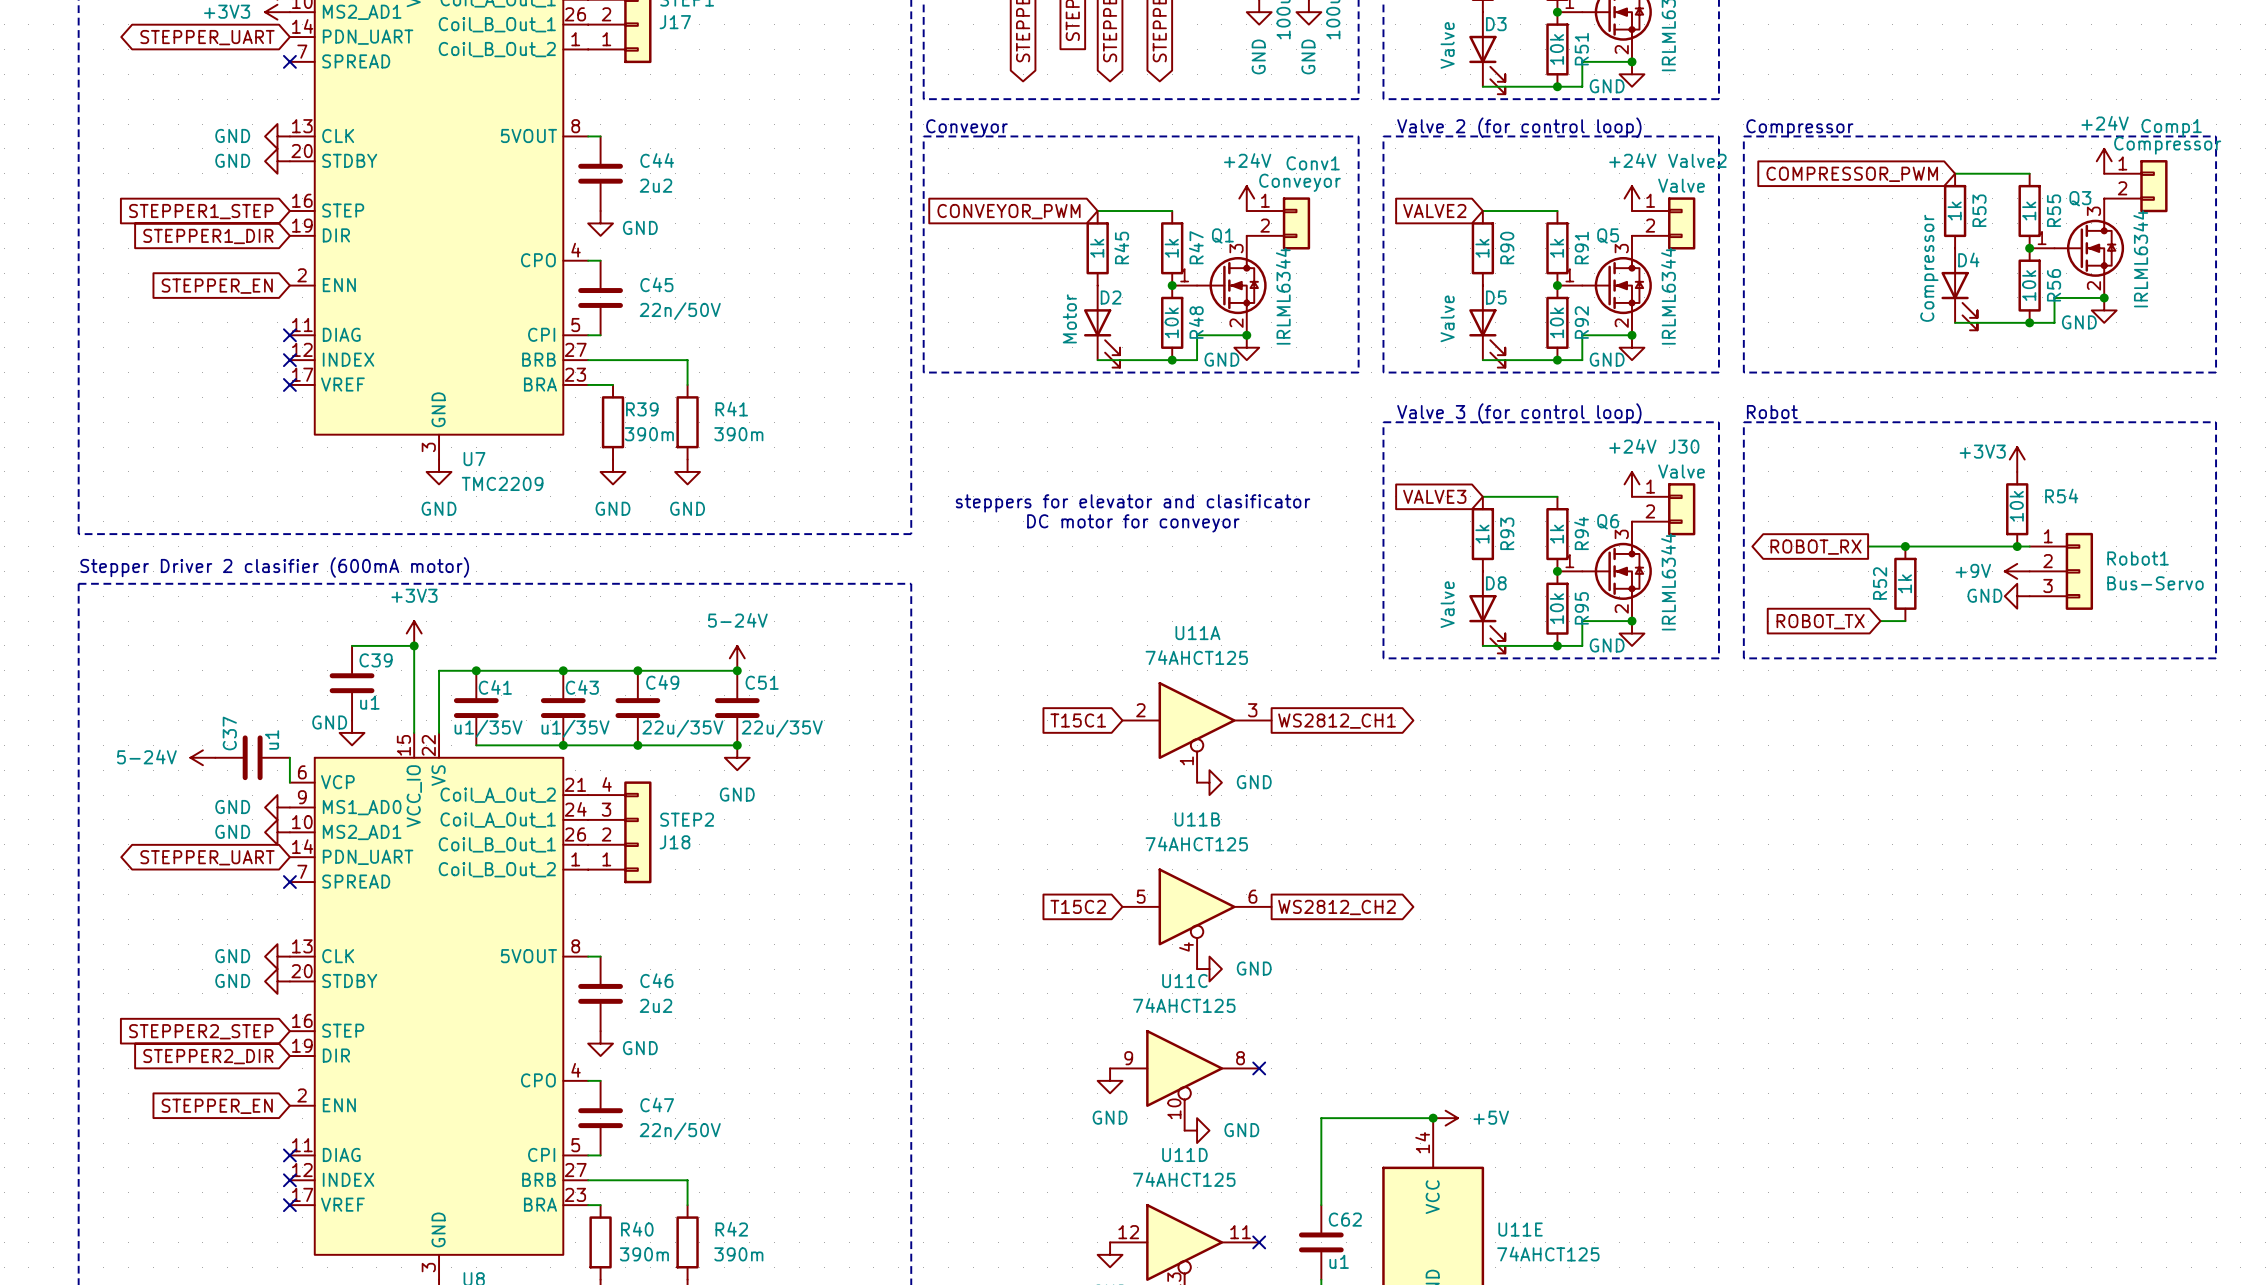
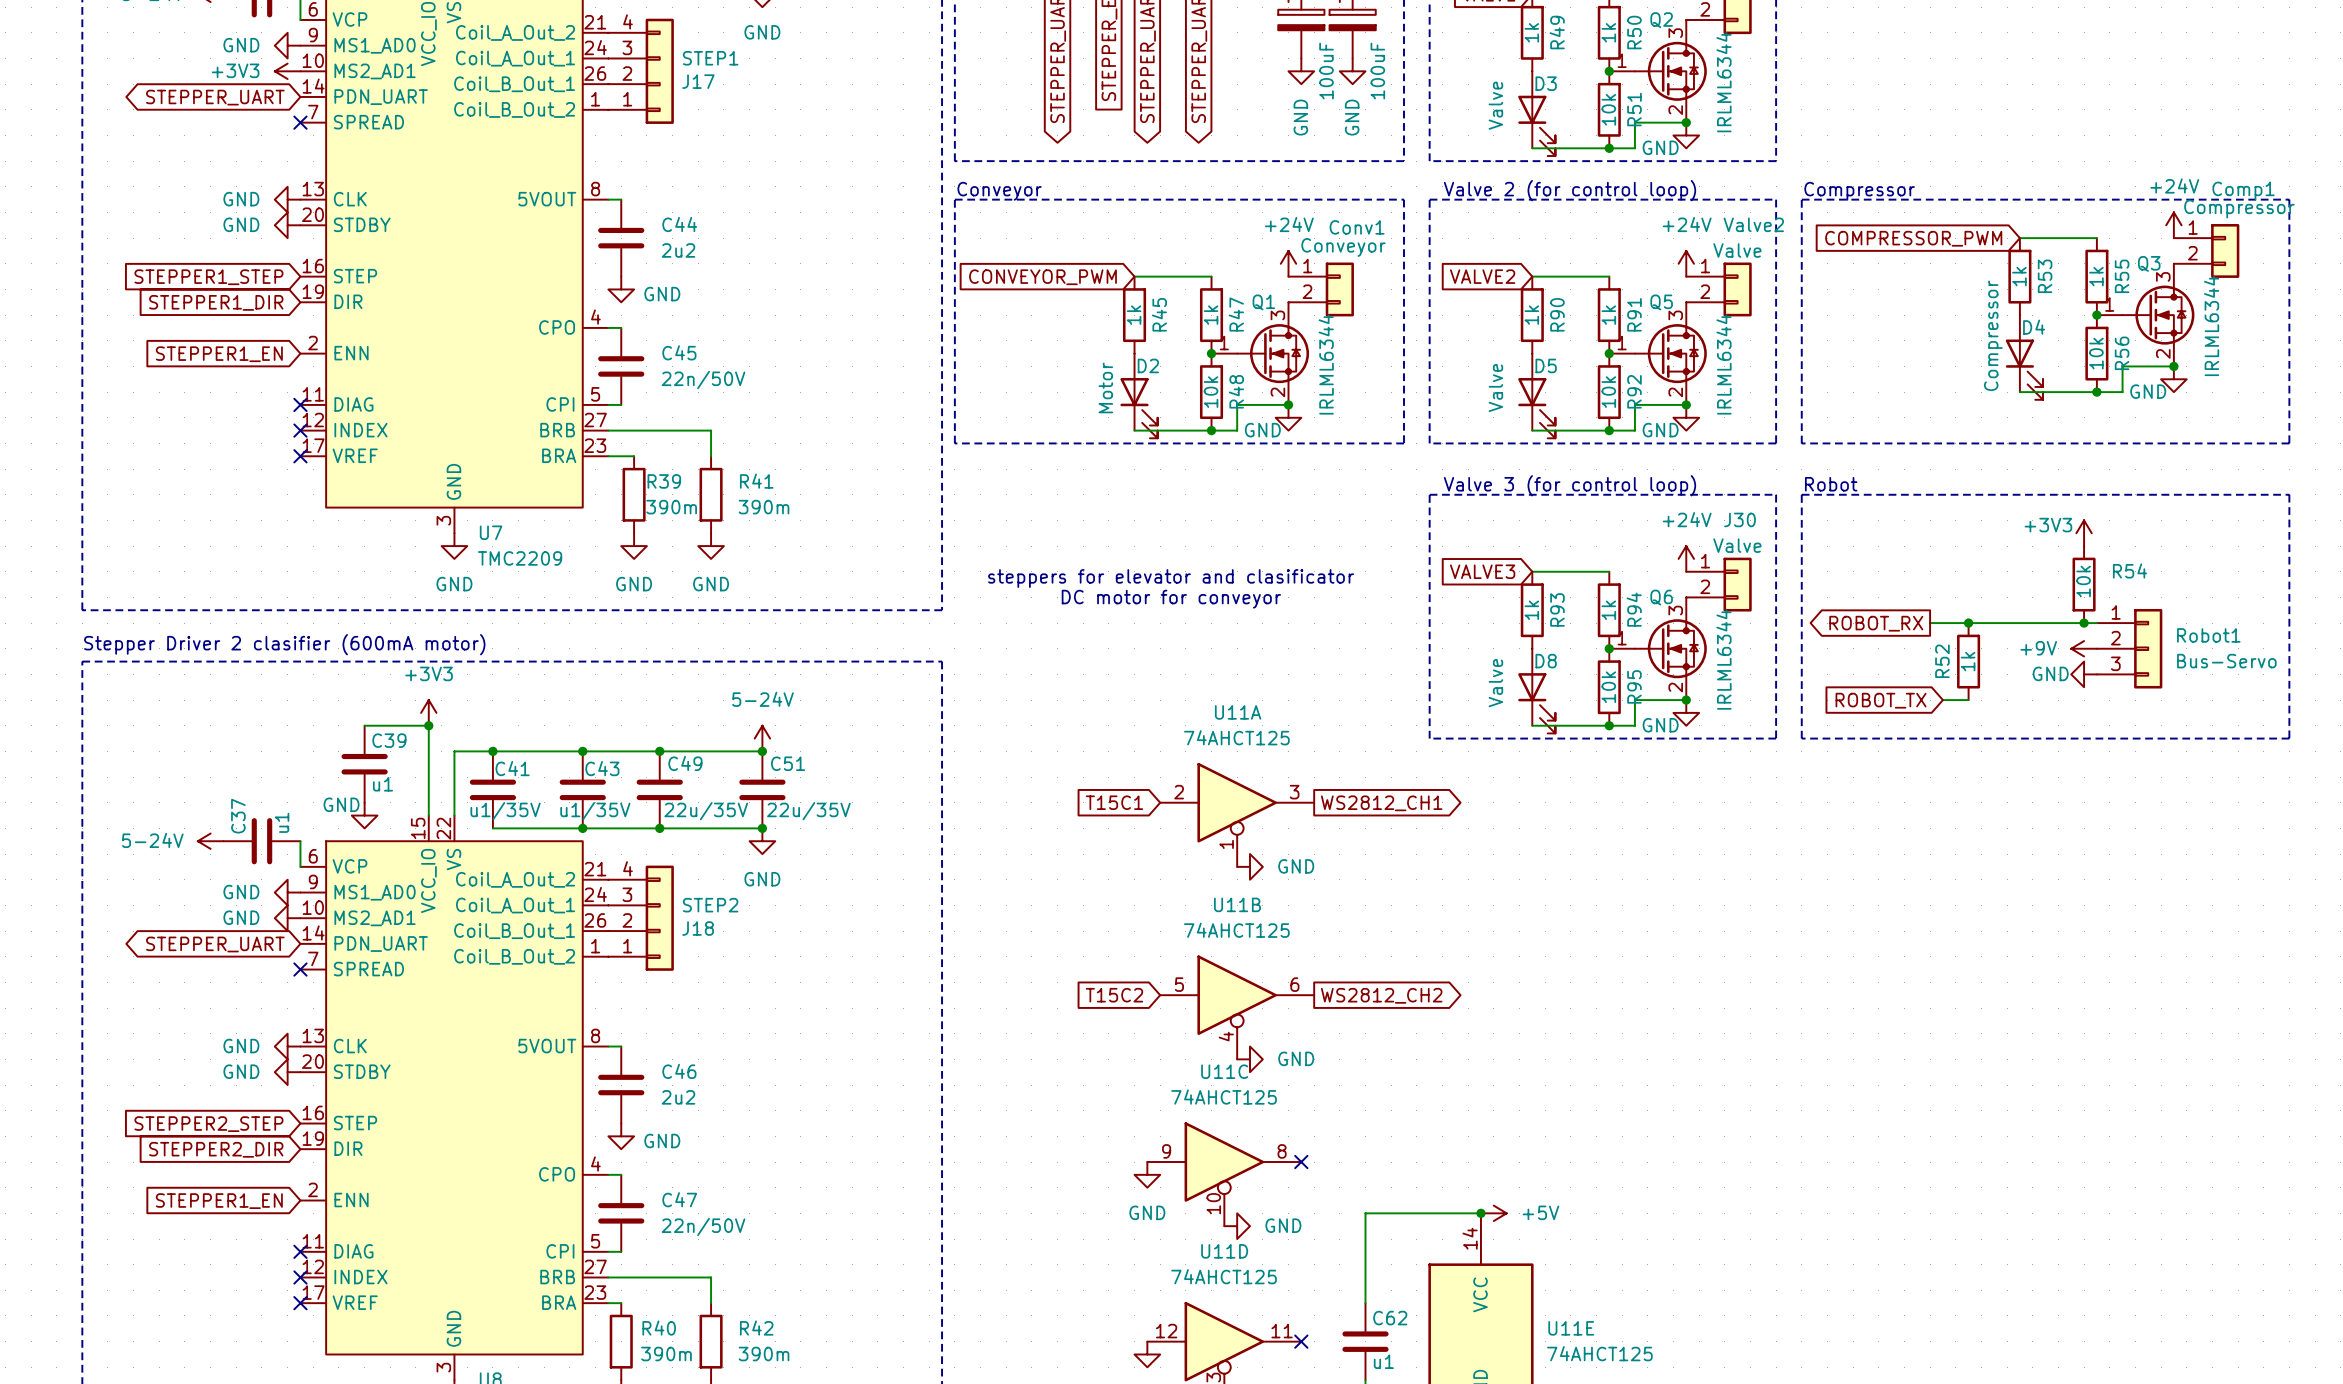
global label: STEPPER_EN (217, 286) -> STEPPER1_EN (219, 354)
global label: STEPPER_EN (217, 1106) -> STEPPER1_EN (219, 1201)

